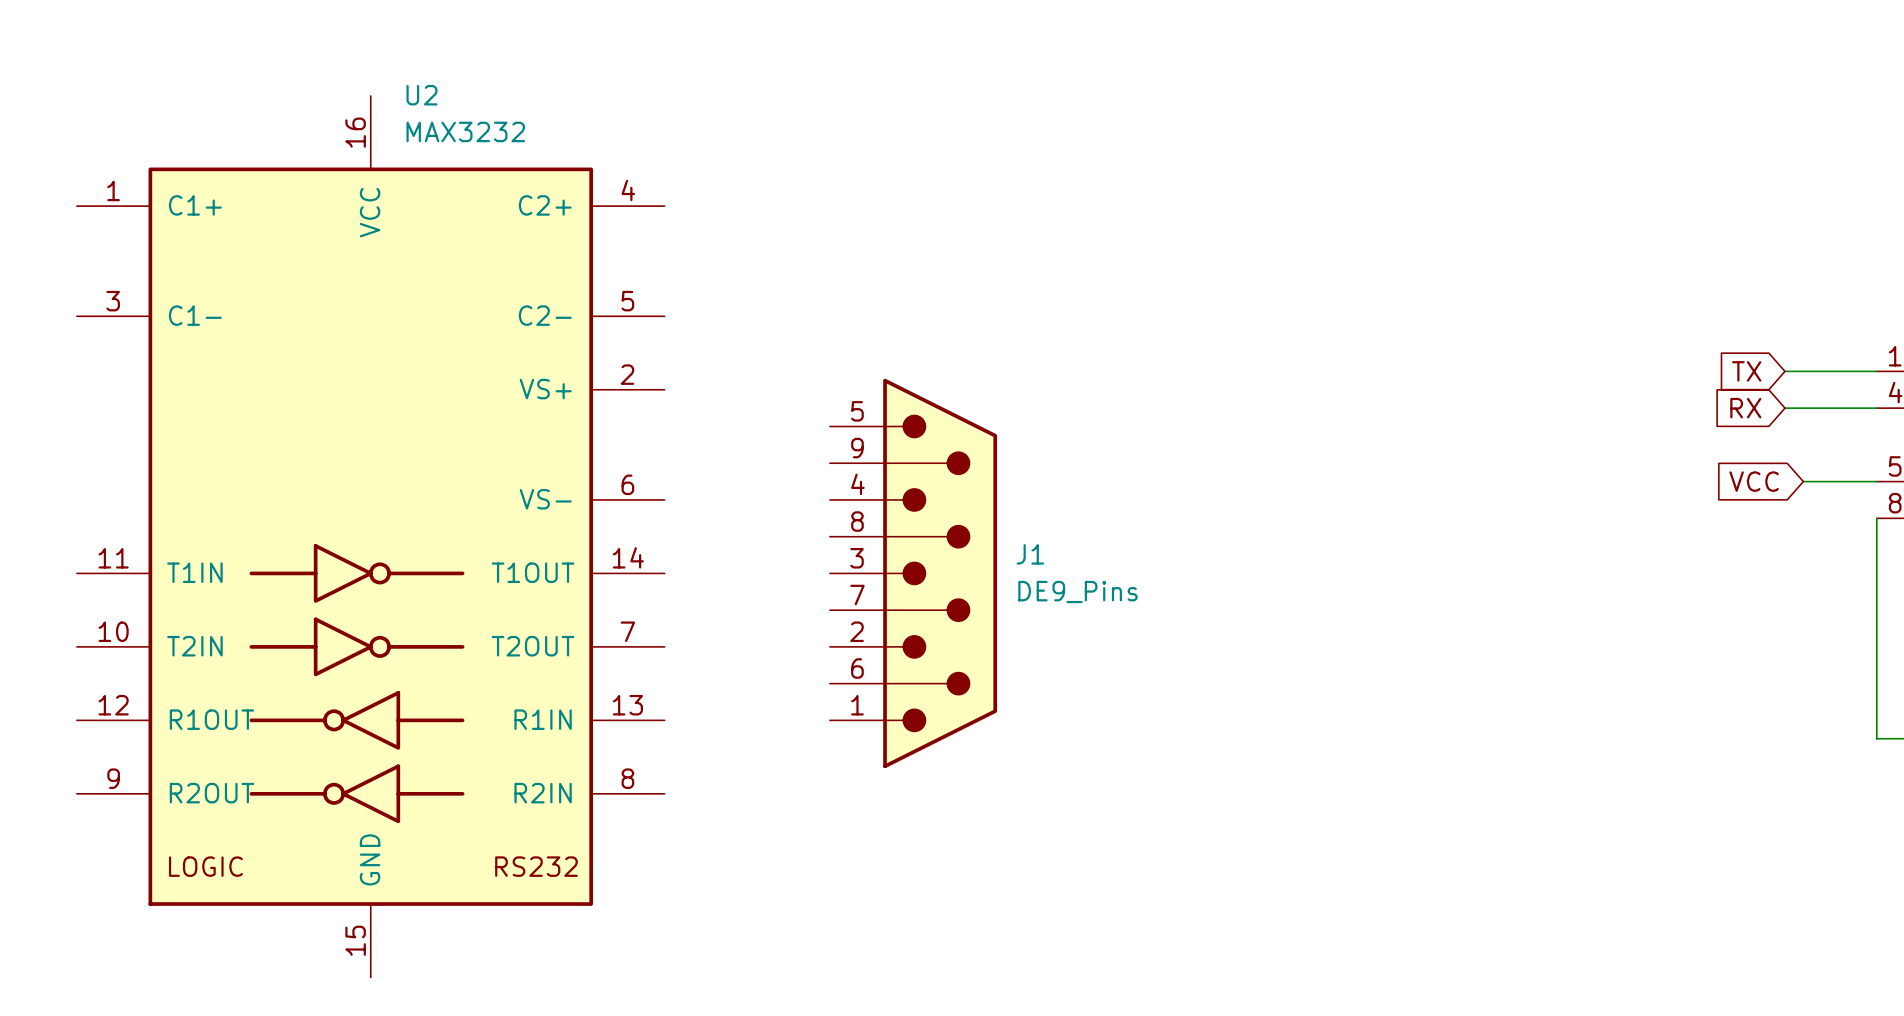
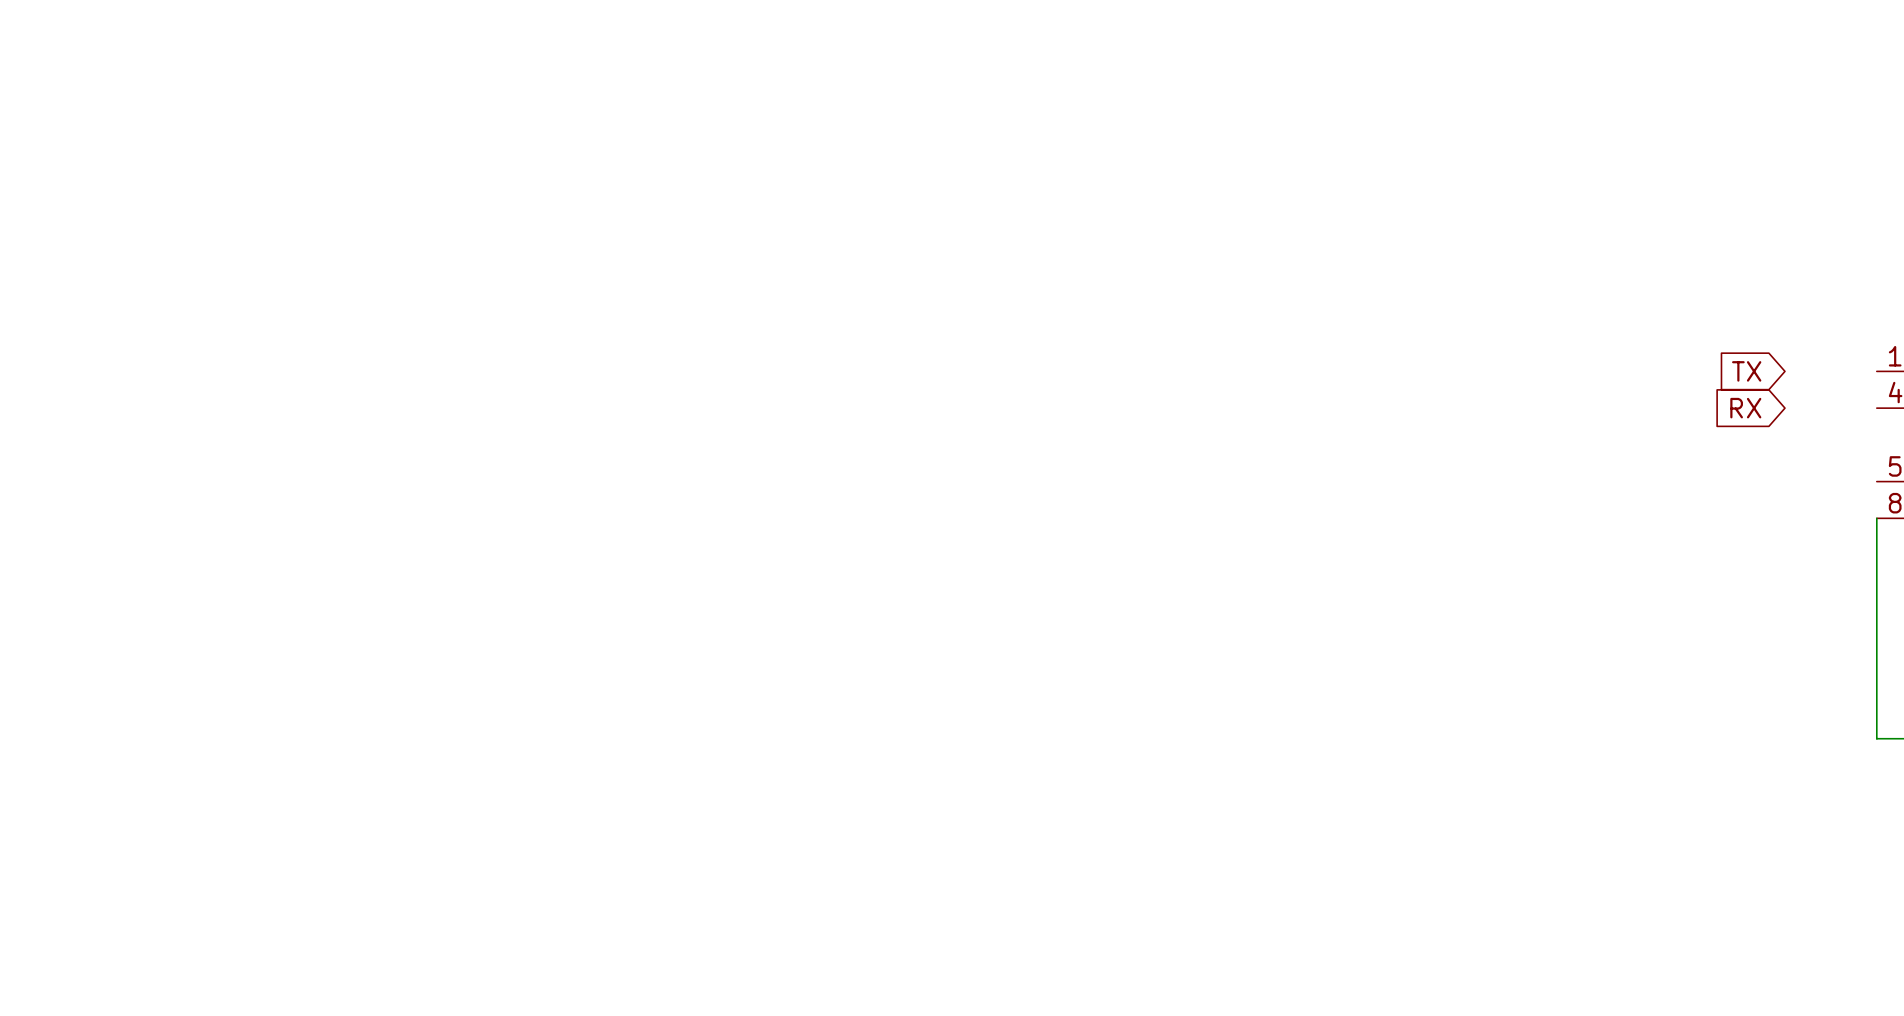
wire: (1784, 371) (1876, 371) -> none
wire: (1784, 408) (1876, 408) -> none
global label: VCC (1754, 481) -> none
wire: (1803, 481) (1876, 481) -> none
U2: MAX3232 (370, 536) -> none
J1: DE9_Pins (913, 573) -> none

